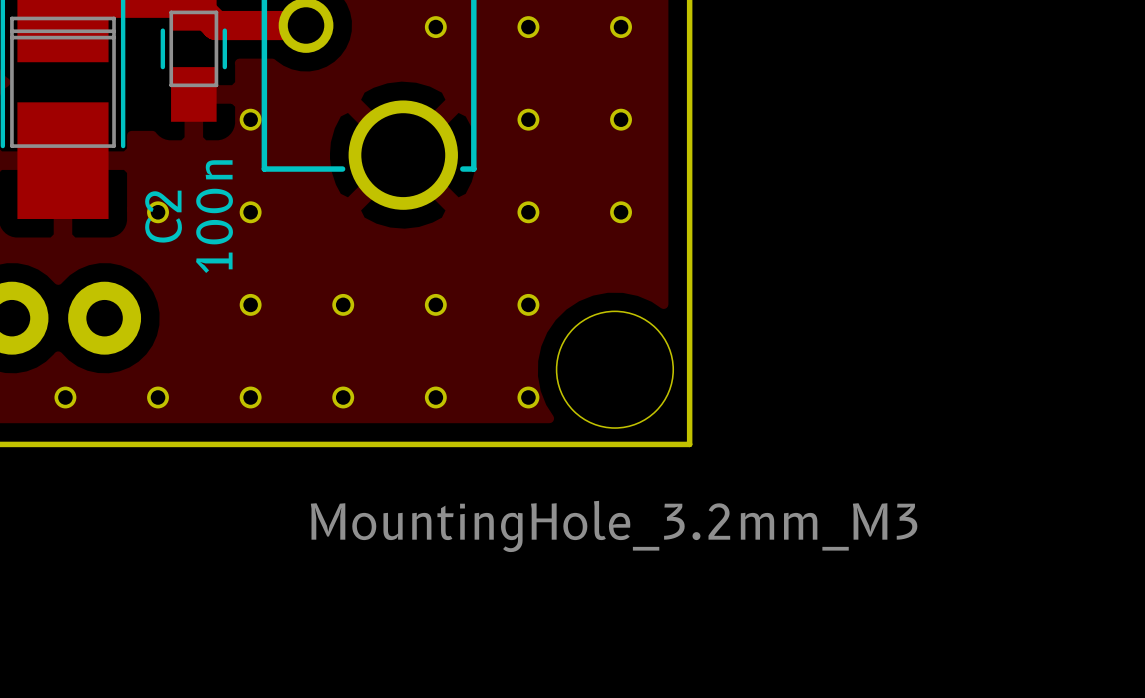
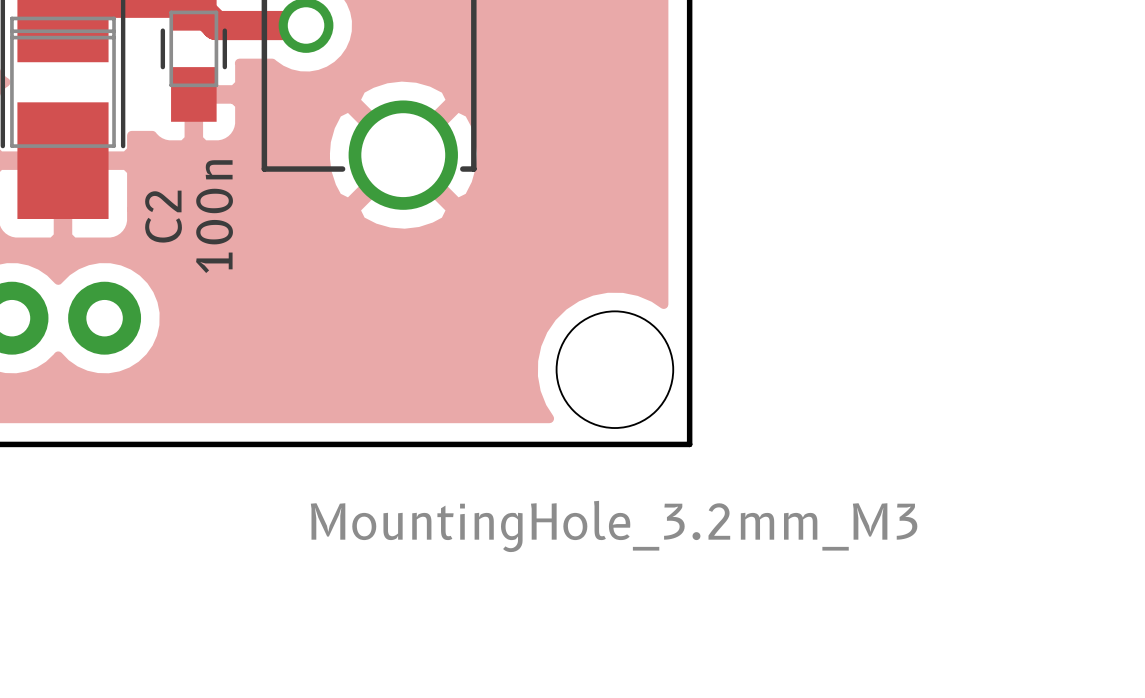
part: (435, 27) -> none
part: (528, 27) -> none
part: (621, 27) -> none
part: (250, 119) -> none
part: (528, 119) -> none
part: (621, 119) -> none
part: (158, 212) -> none
part: (250, 212) -> none
part: (528, 212) -> none
part: (621, 212) -> none
part: (250, 304) -> none
part: (343, 304) -> none
part: (435, 304) -> none
part: (528, 304) -> none
part: (65, 397) -> none
part: (158, 397) -> none
part: (250, 397) -> none
part: (343, 397) -> none
part: (435, 397) -> none
part: (528, 397) -> none

